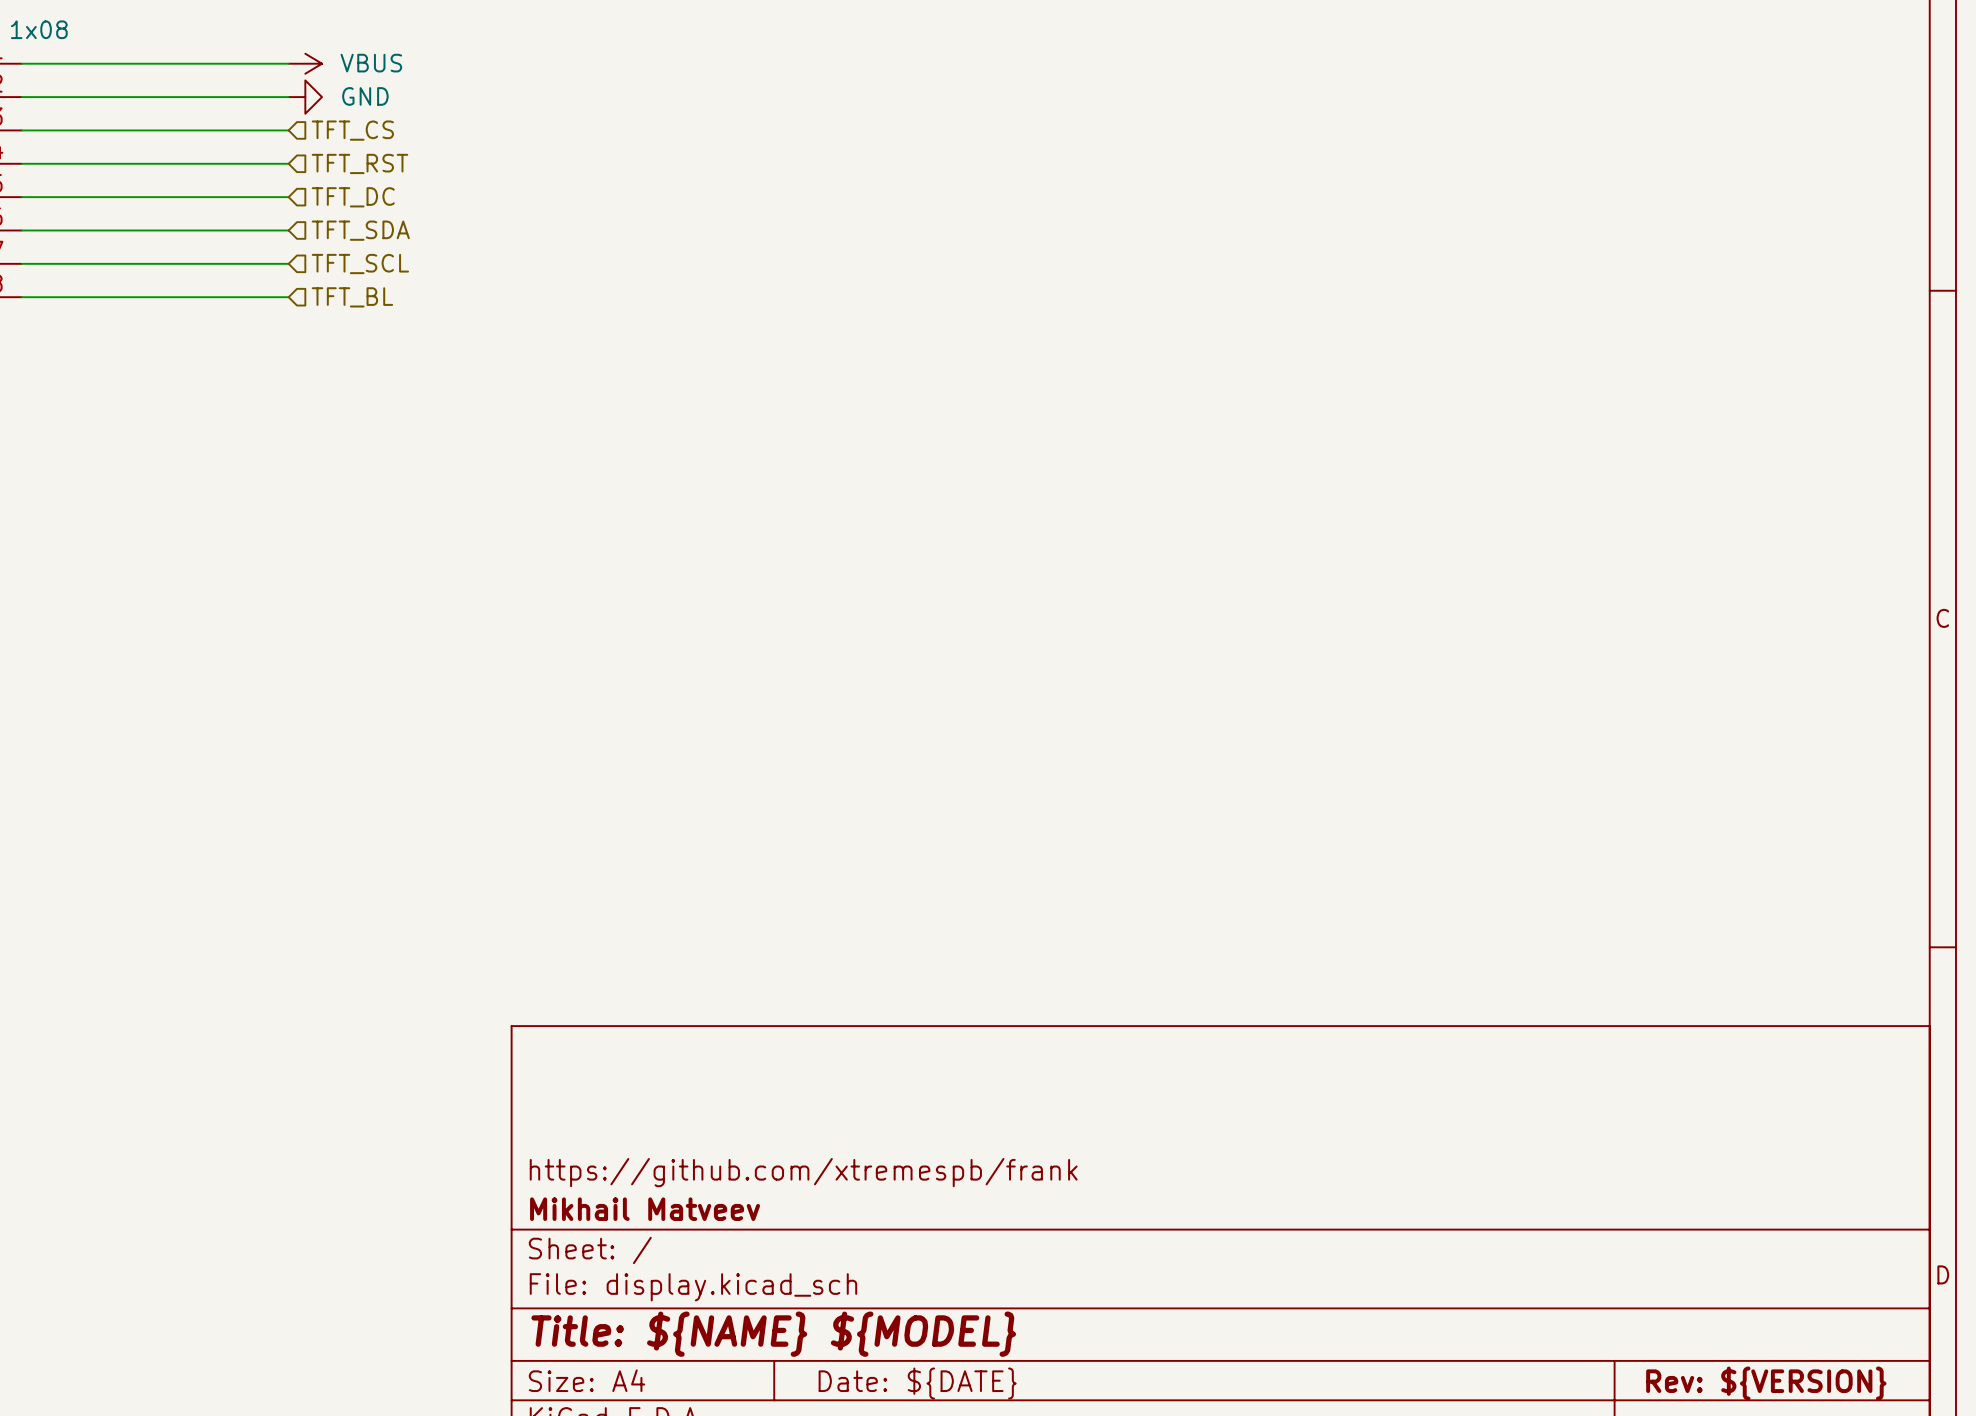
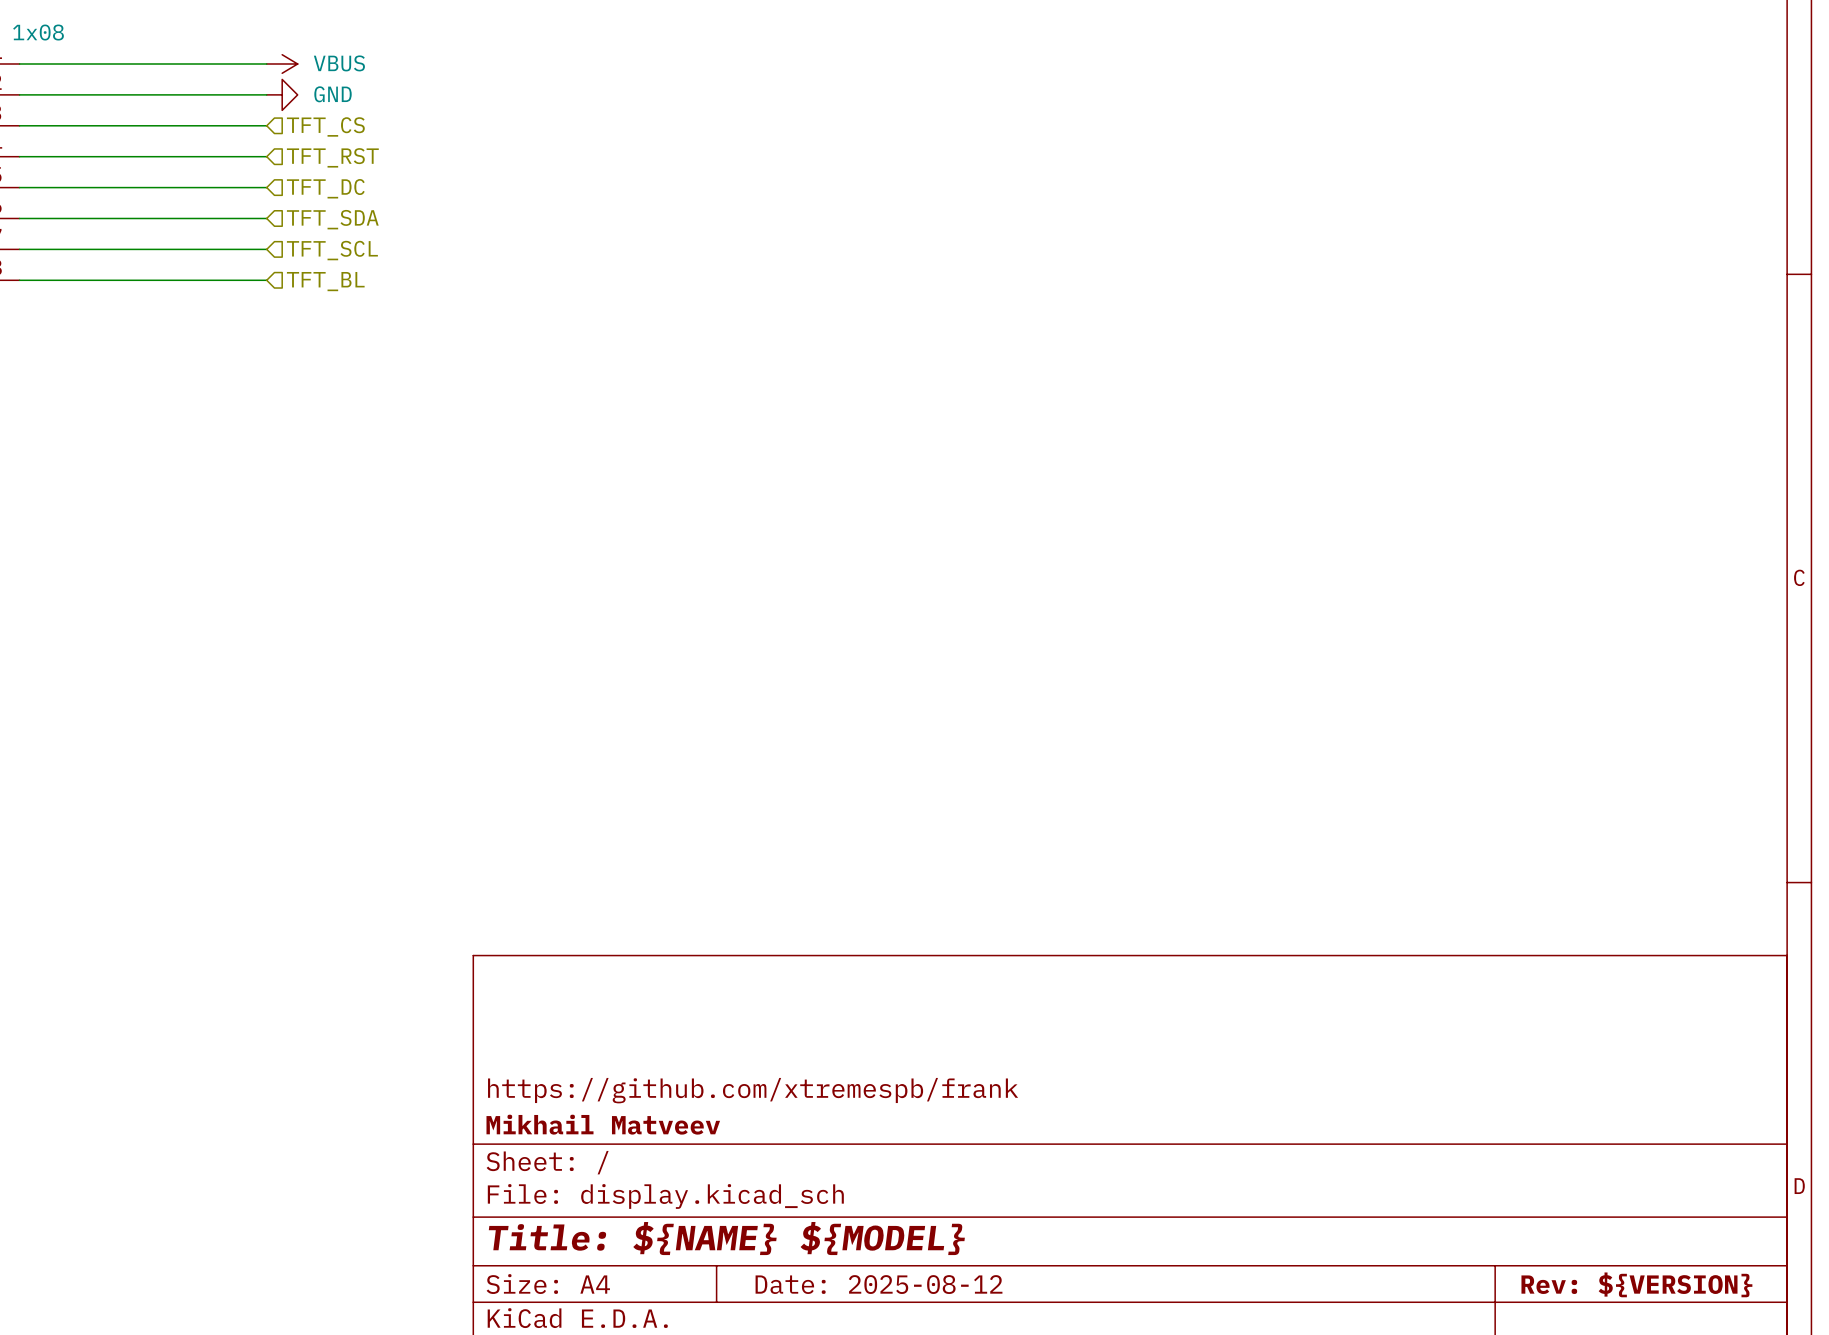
title block: Date: ${DATE} (917, 1383) -> Date: 2025-08-12 (879, 1284)

